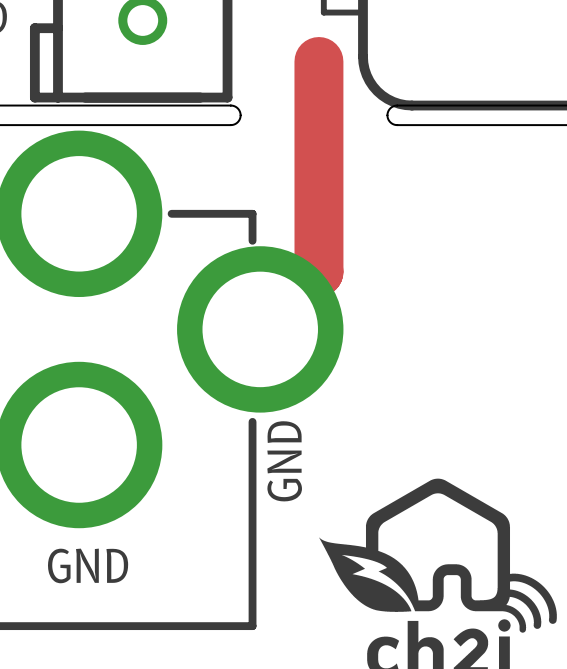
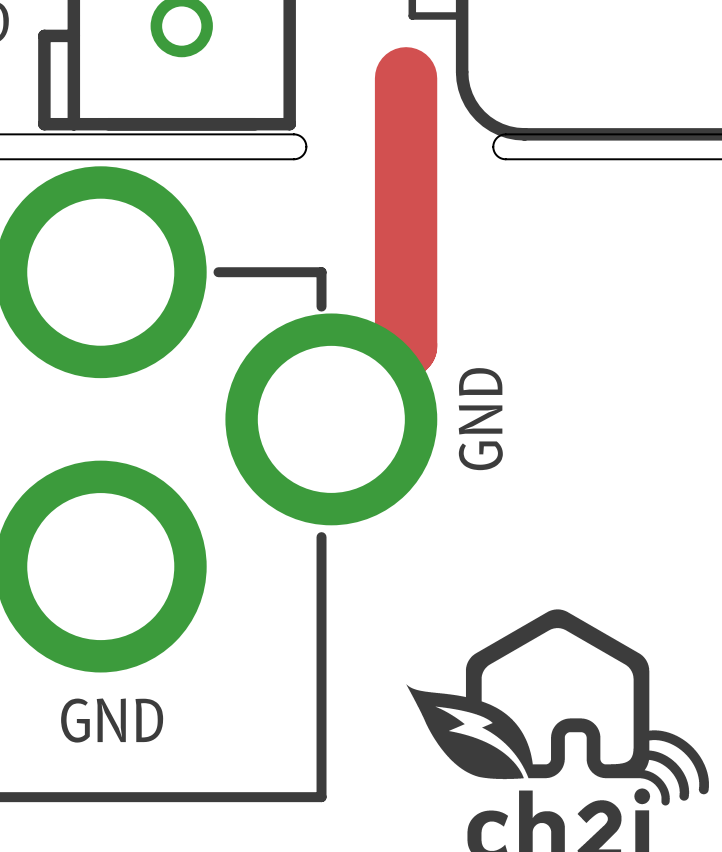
text position: GND (284, 461) -> GND (480, 419)

